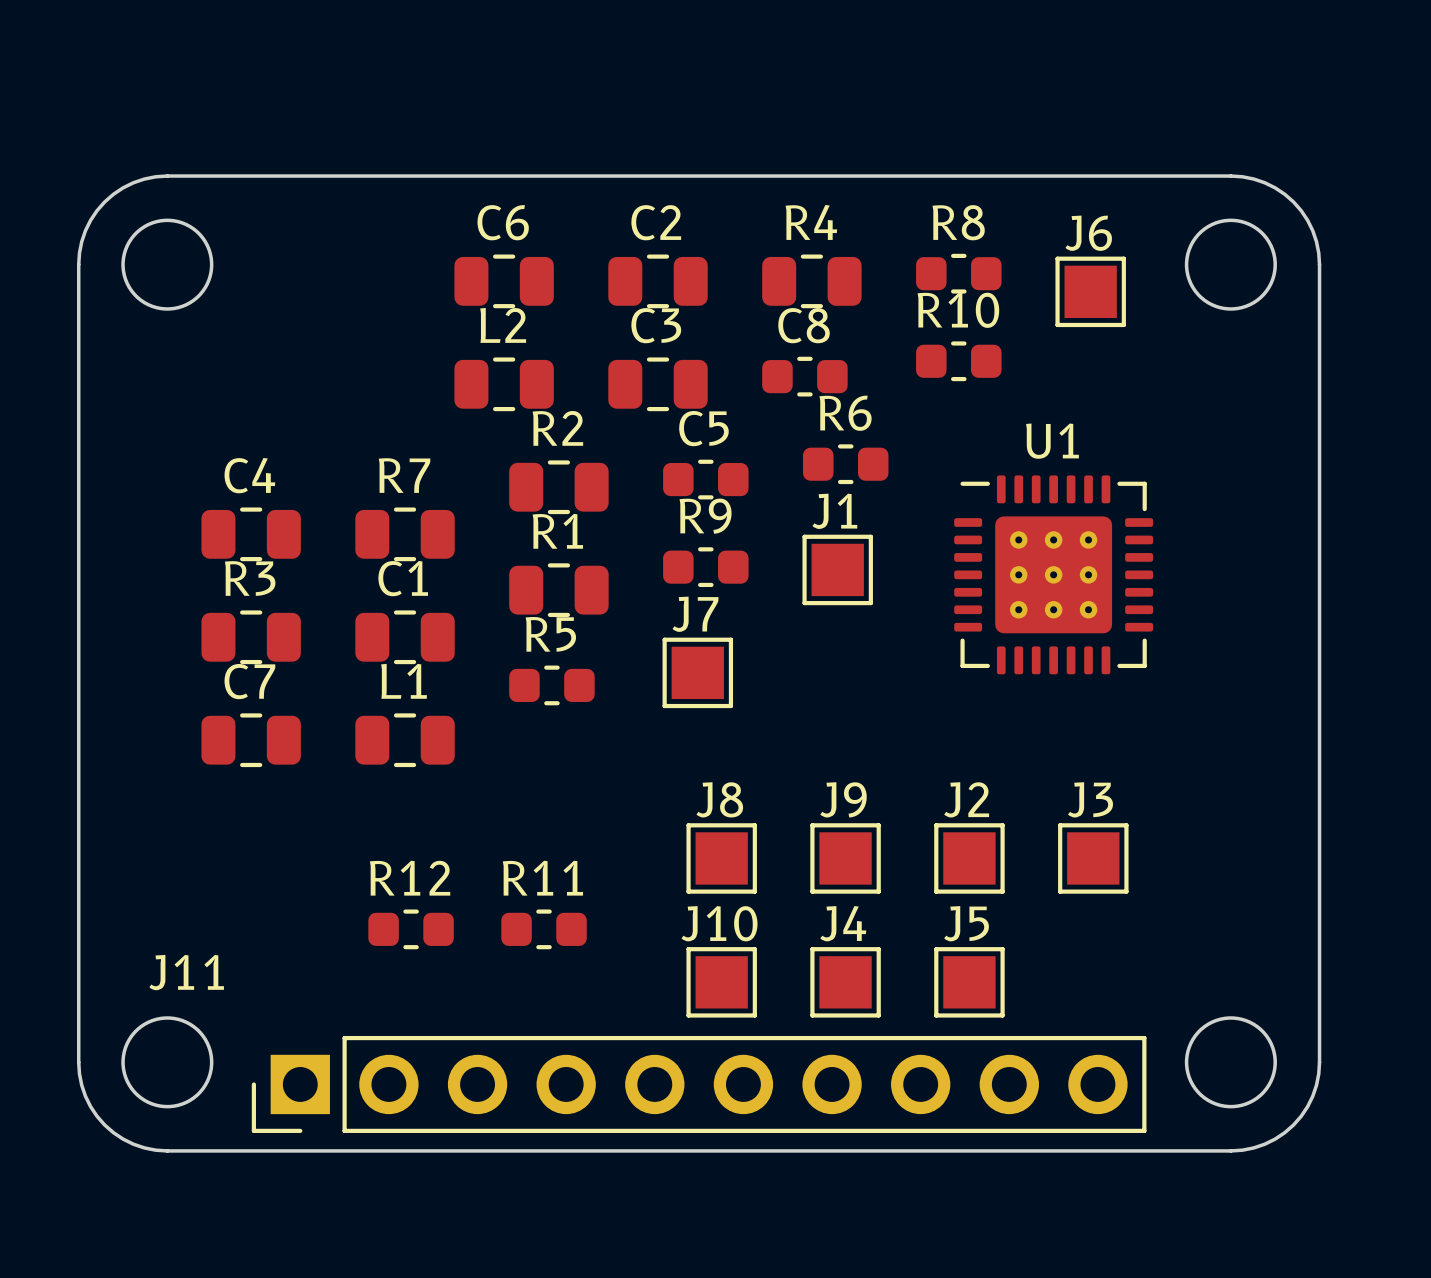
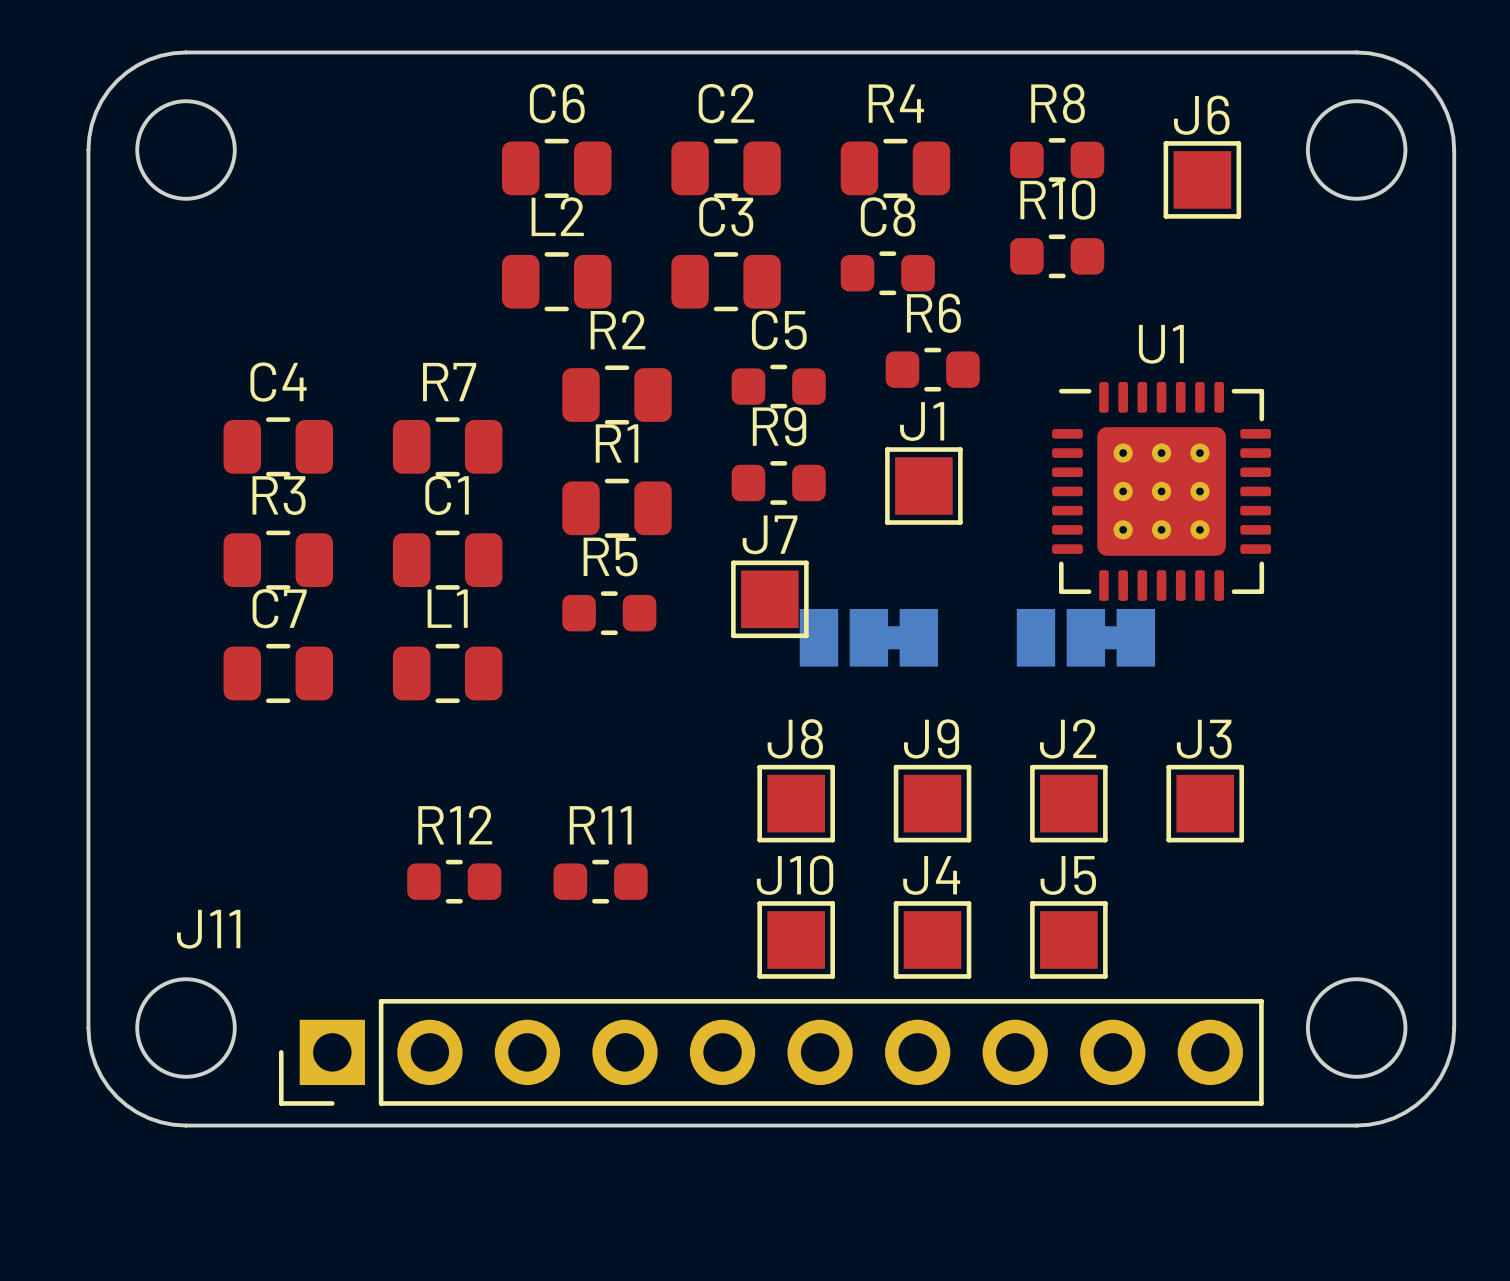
part: none -> (868, 637)
part: none -> (1085, 637)

